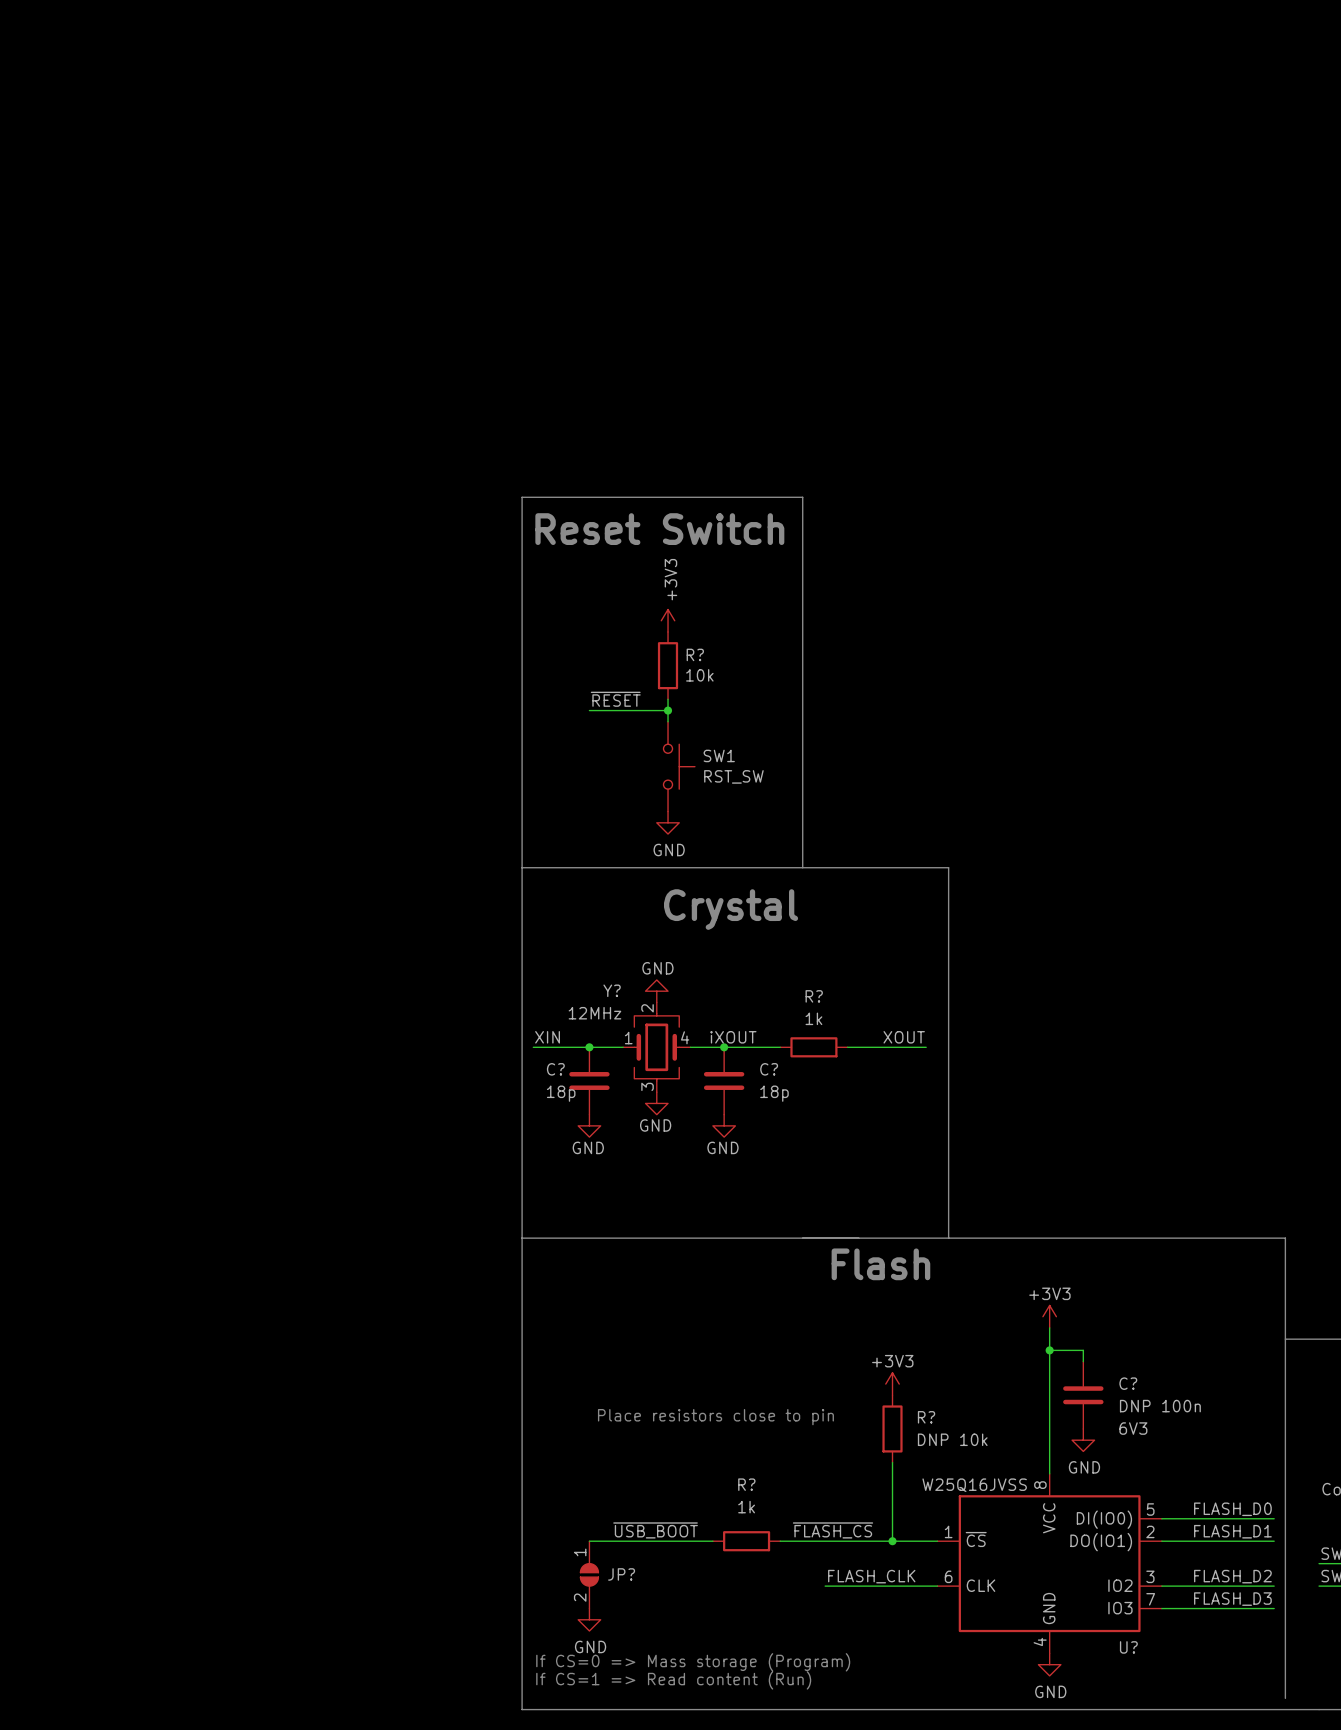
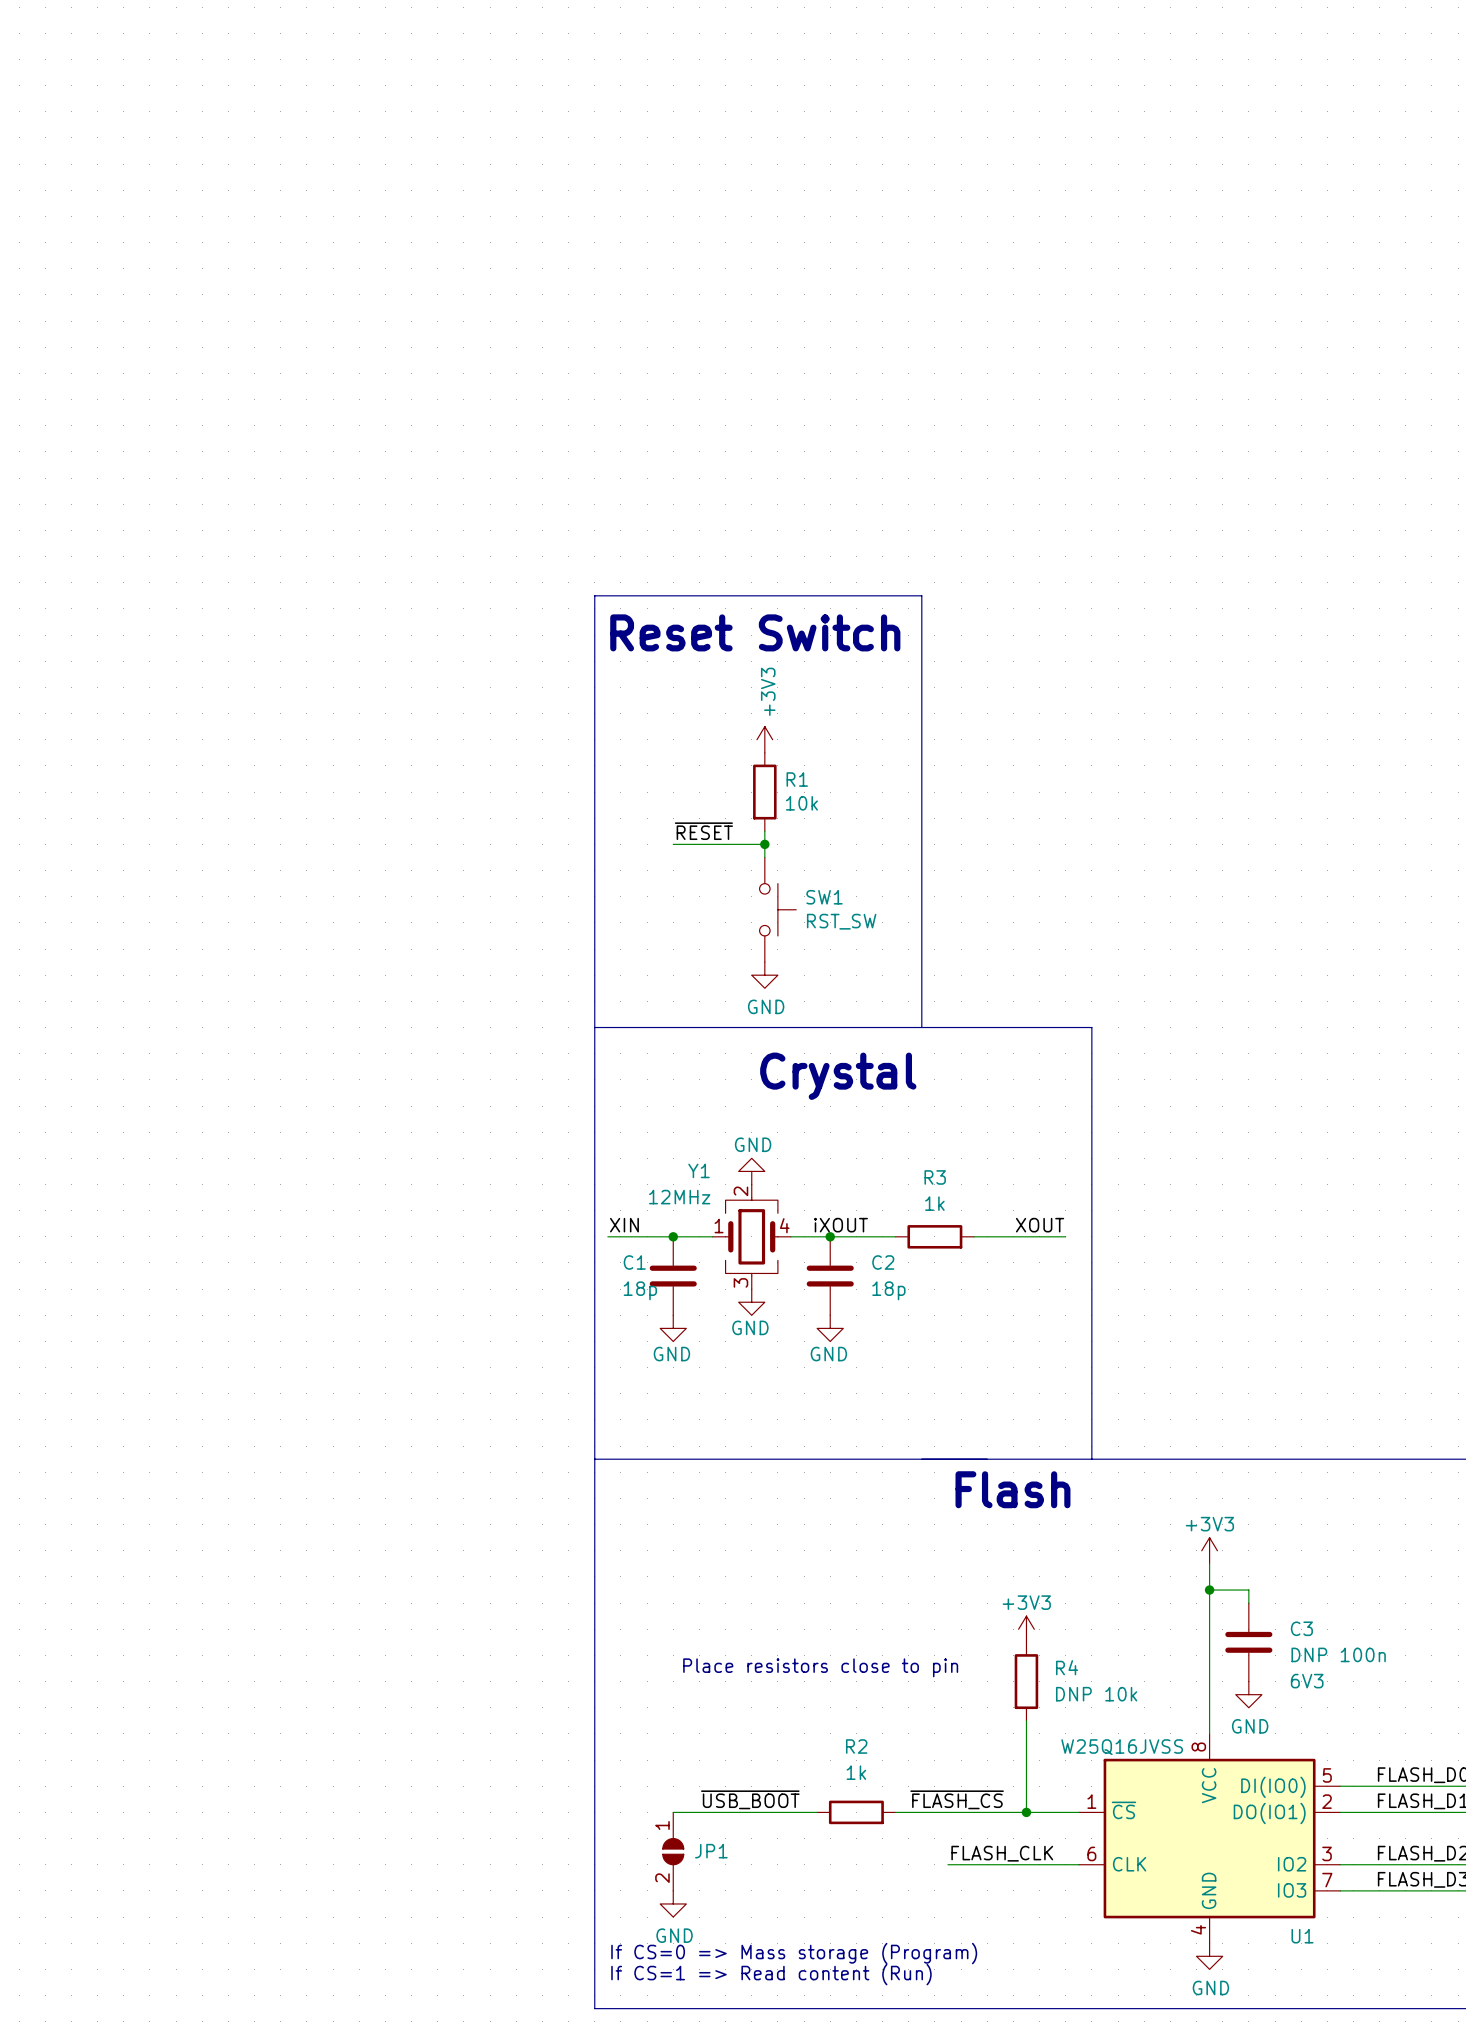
R? name: R? (695, 654) -> R1 (797, 779)
Y? name: Y? (612, 990) -> Y1 (699, 1170)
R? name: R? (814, 996) -> R3 (935, 1177)
C? name: C? (555, 1069) -> C1 (634, 1262)
C? name: C? (769, 1069) -> C2 (883, 1262)
C? name: C? (1128, 1383) -> C3 (1301, 1628)
R? name: R? (926, 1417) -> R4 (1067, 1667)
R? name: R? (746, 1484) -> R2 (856, 1746)
JP? name: JP? (621, 1574) -> JP1 (711, 1851)
U? name: U? (1128, 1647) -> U1 (1302, 1936)

